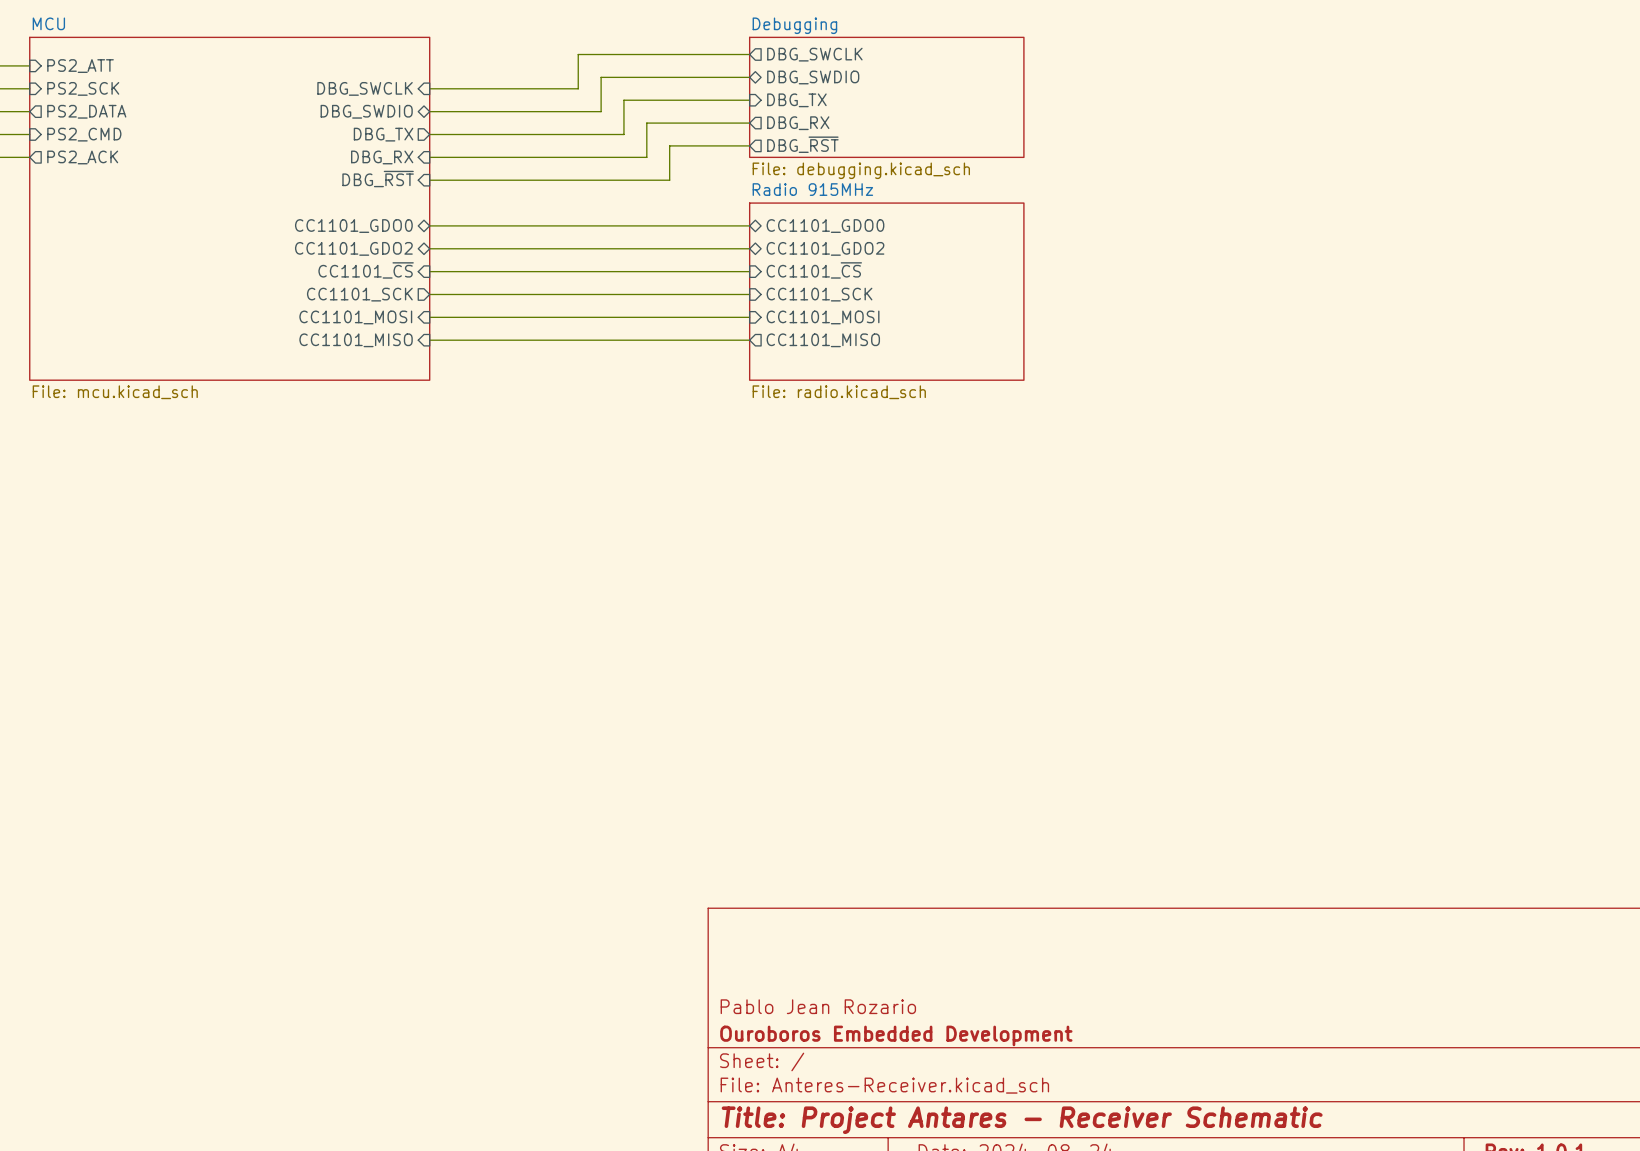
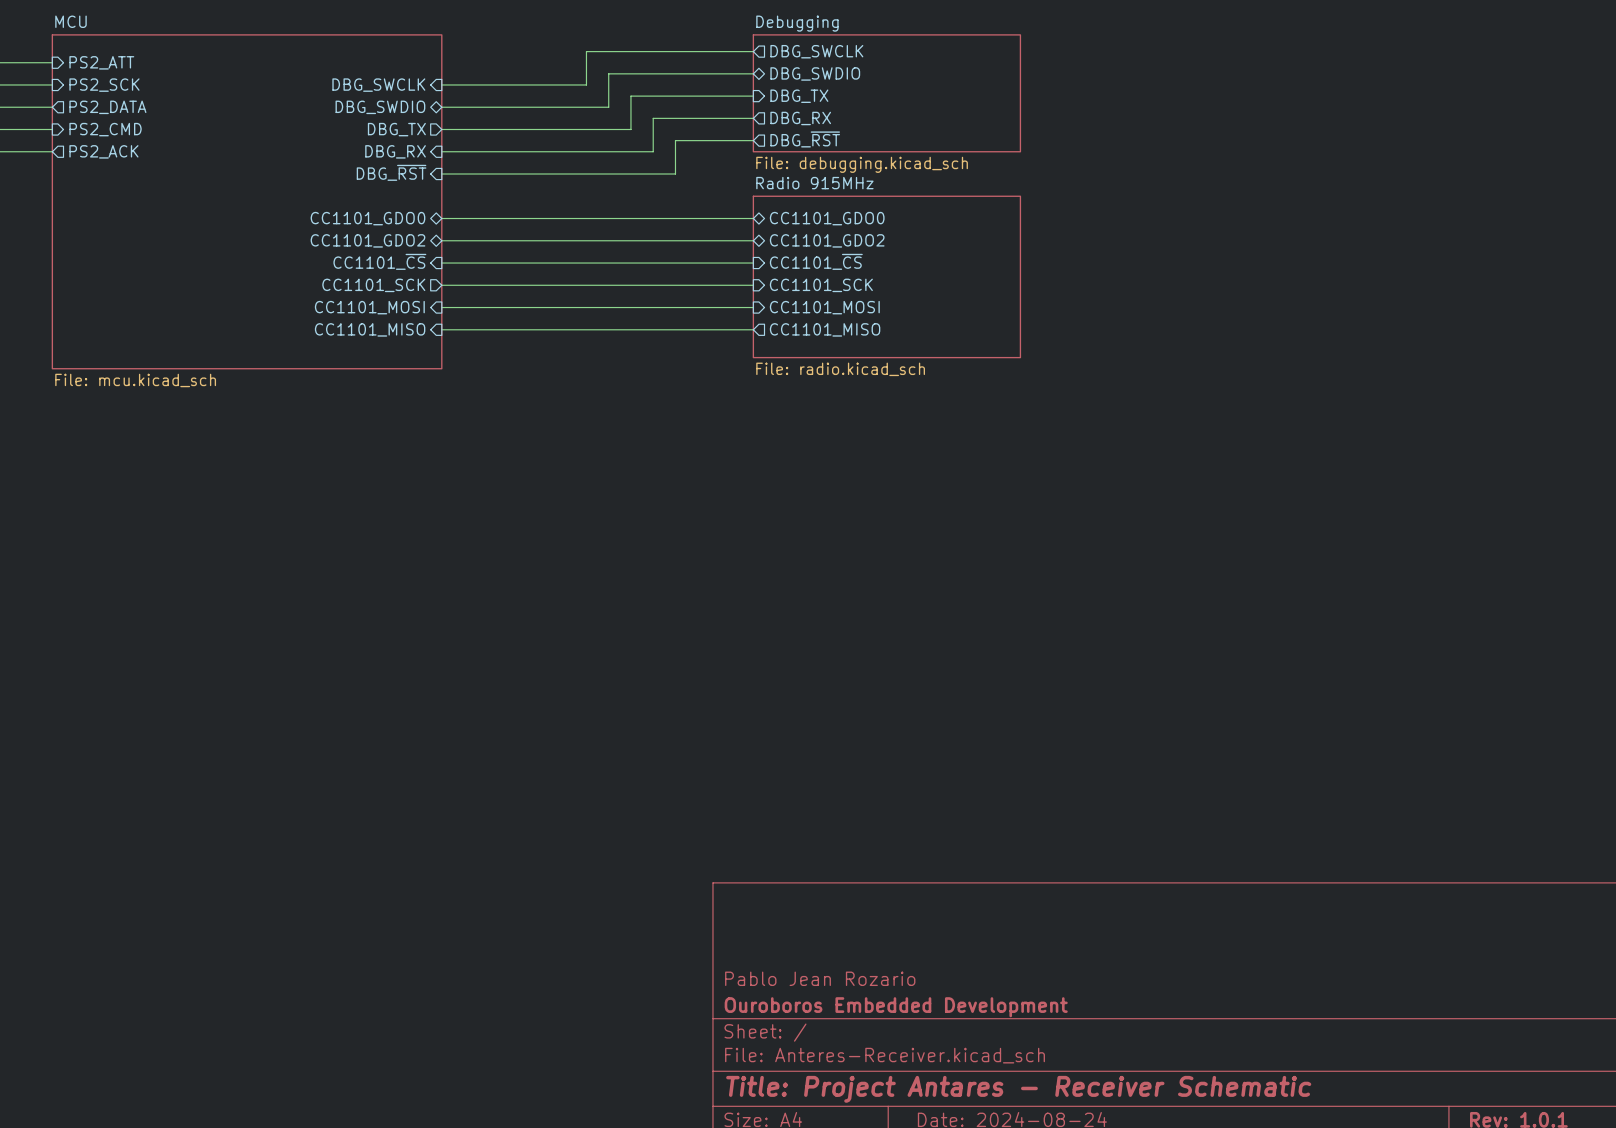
sheet Radio 915MHz shape: [748, 202, 1025, 381] -> [752, 195, 1022, 359]

